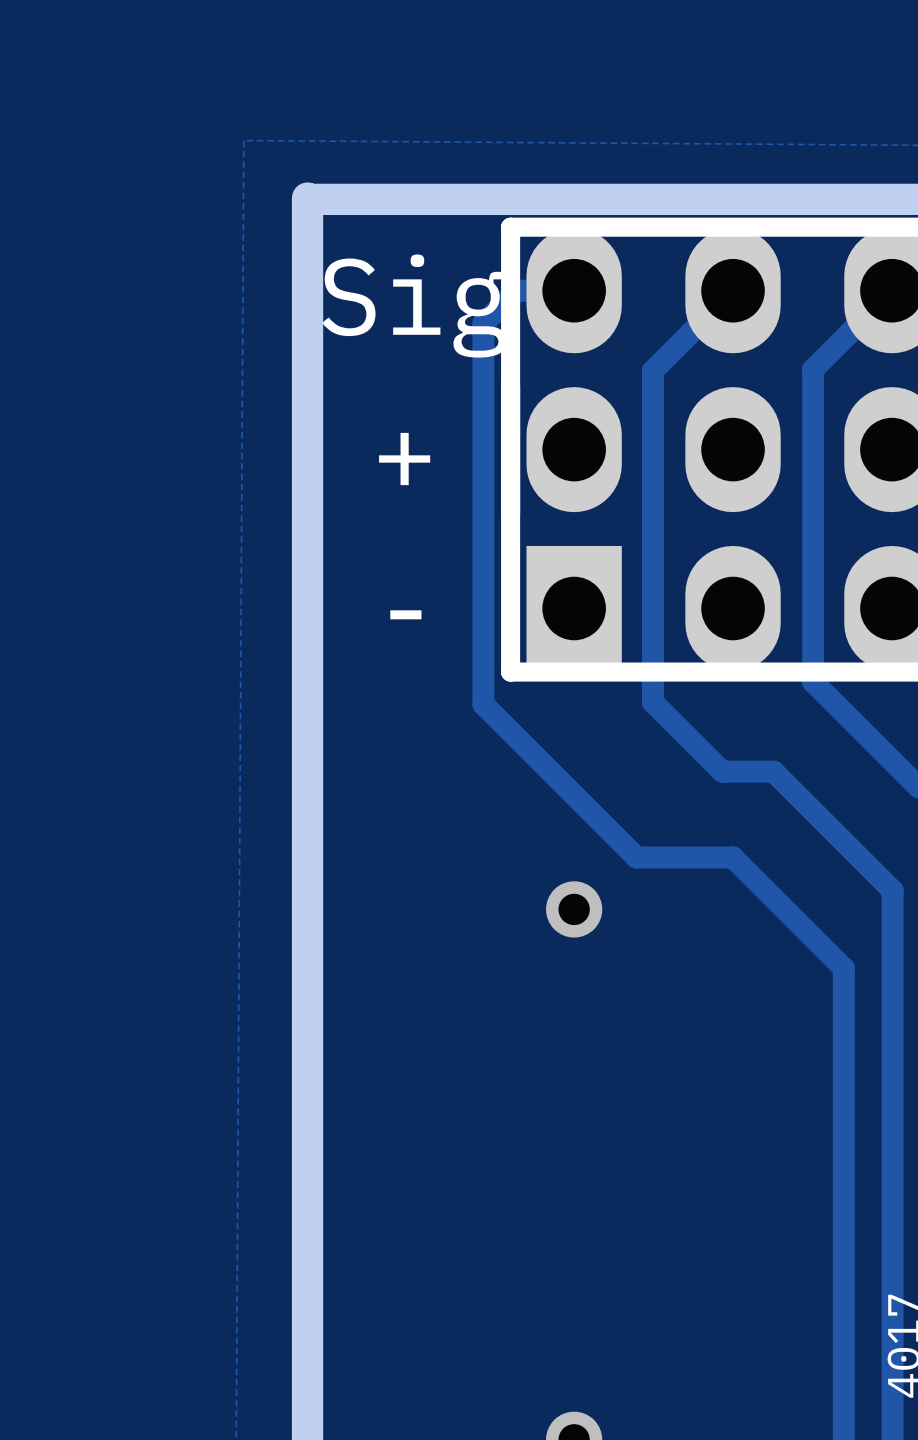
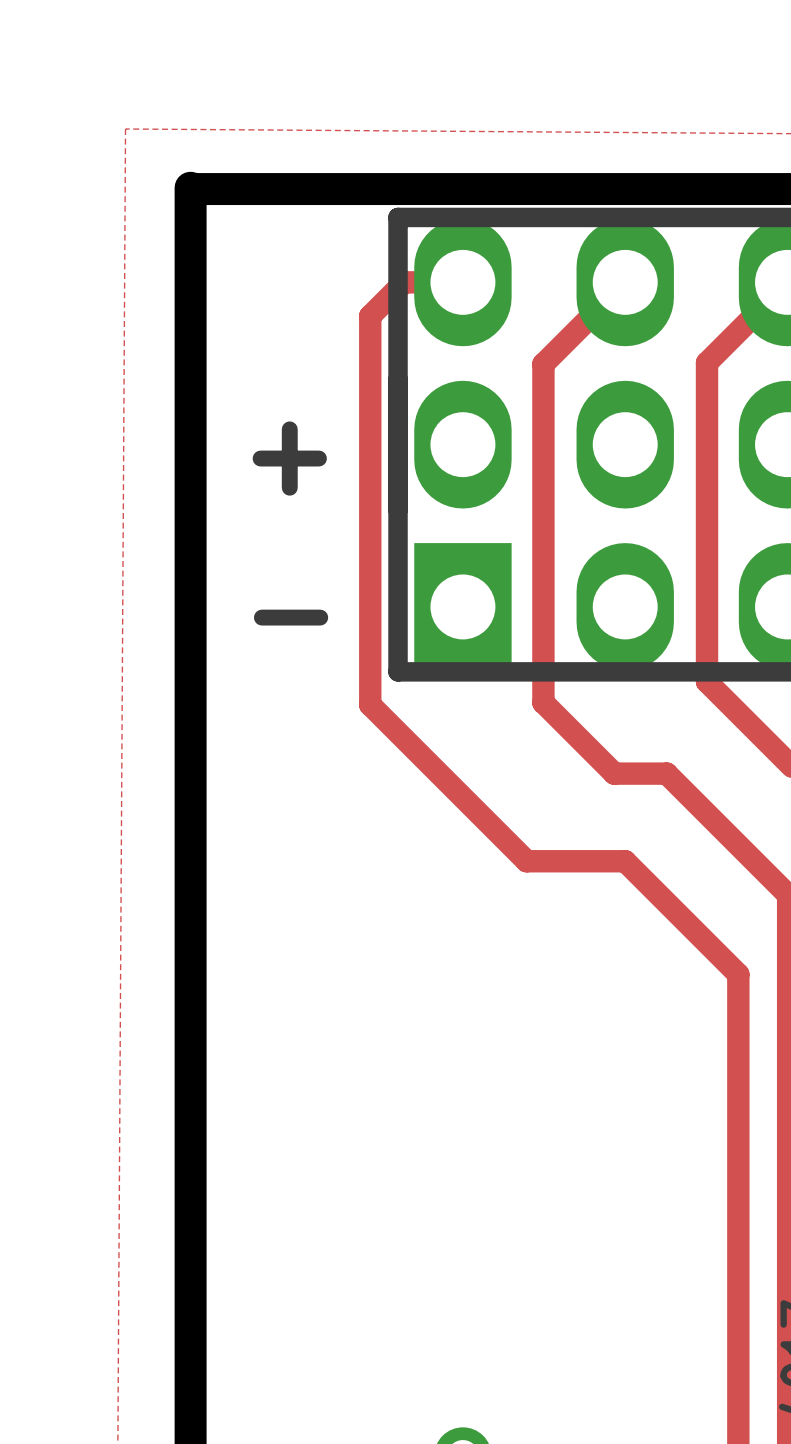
text: Sig (414, 306) -> none
via: (574, 909) -> none

